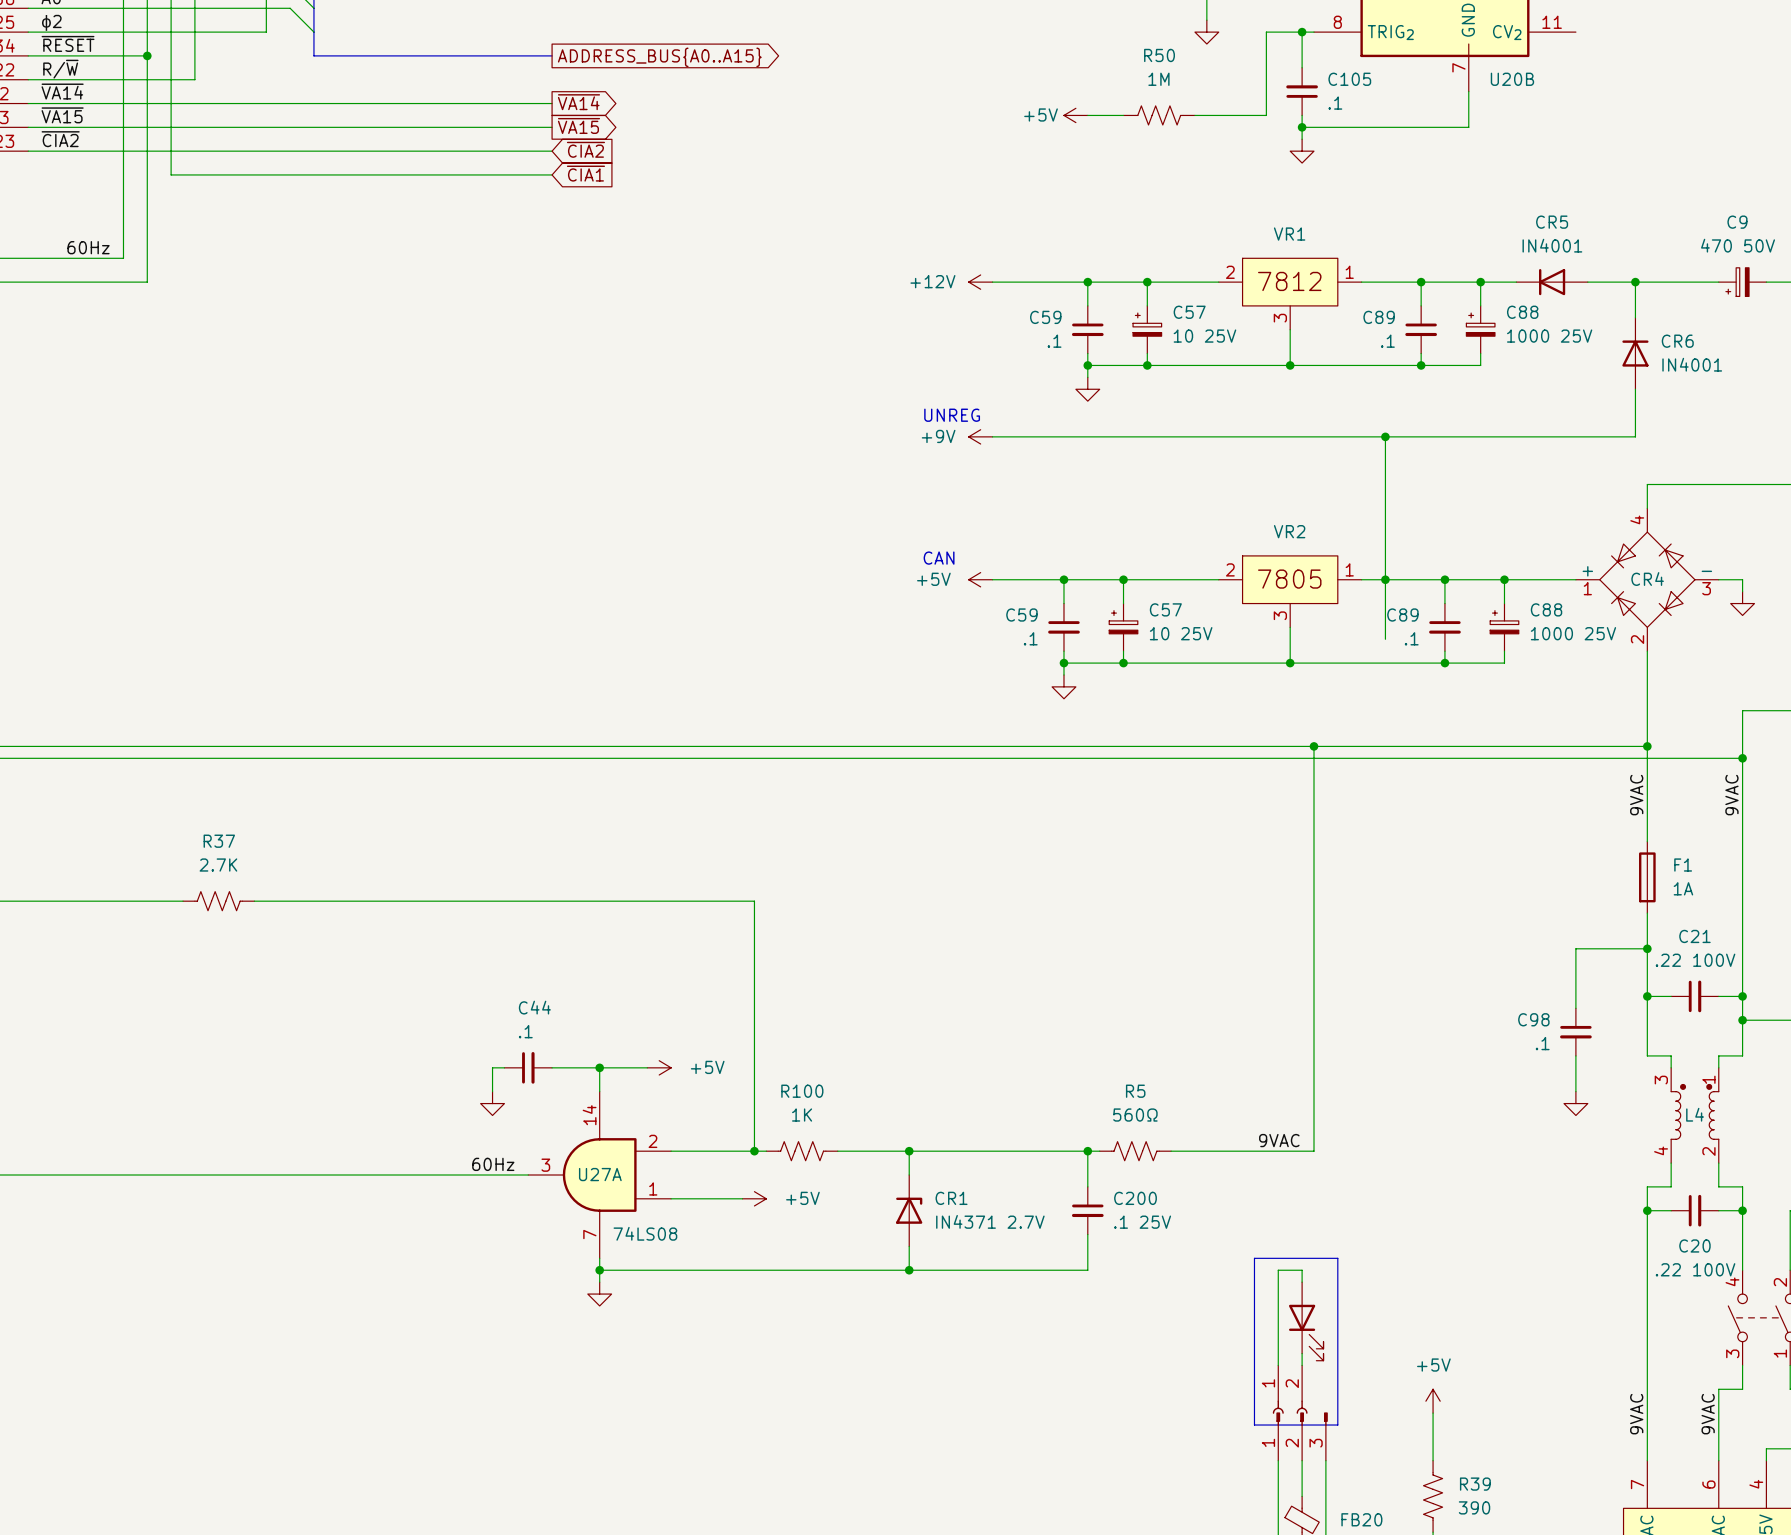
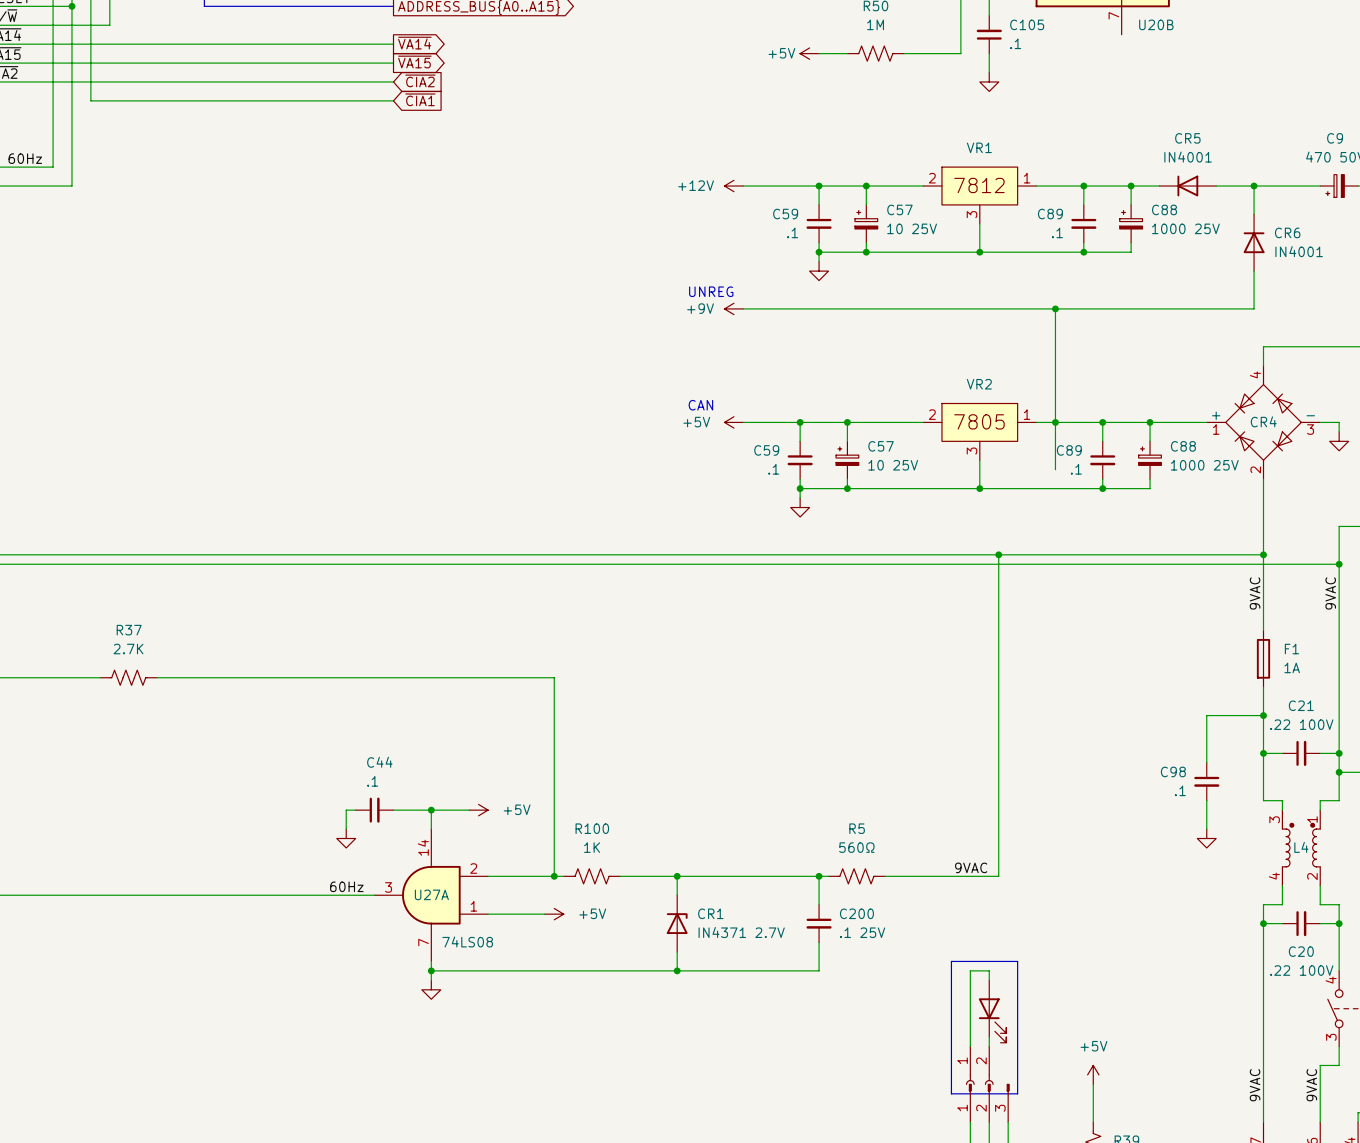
wire: (1468, 91) (1468, 127) (1302, 127) -> none
junction: (1302, 127) -> none

